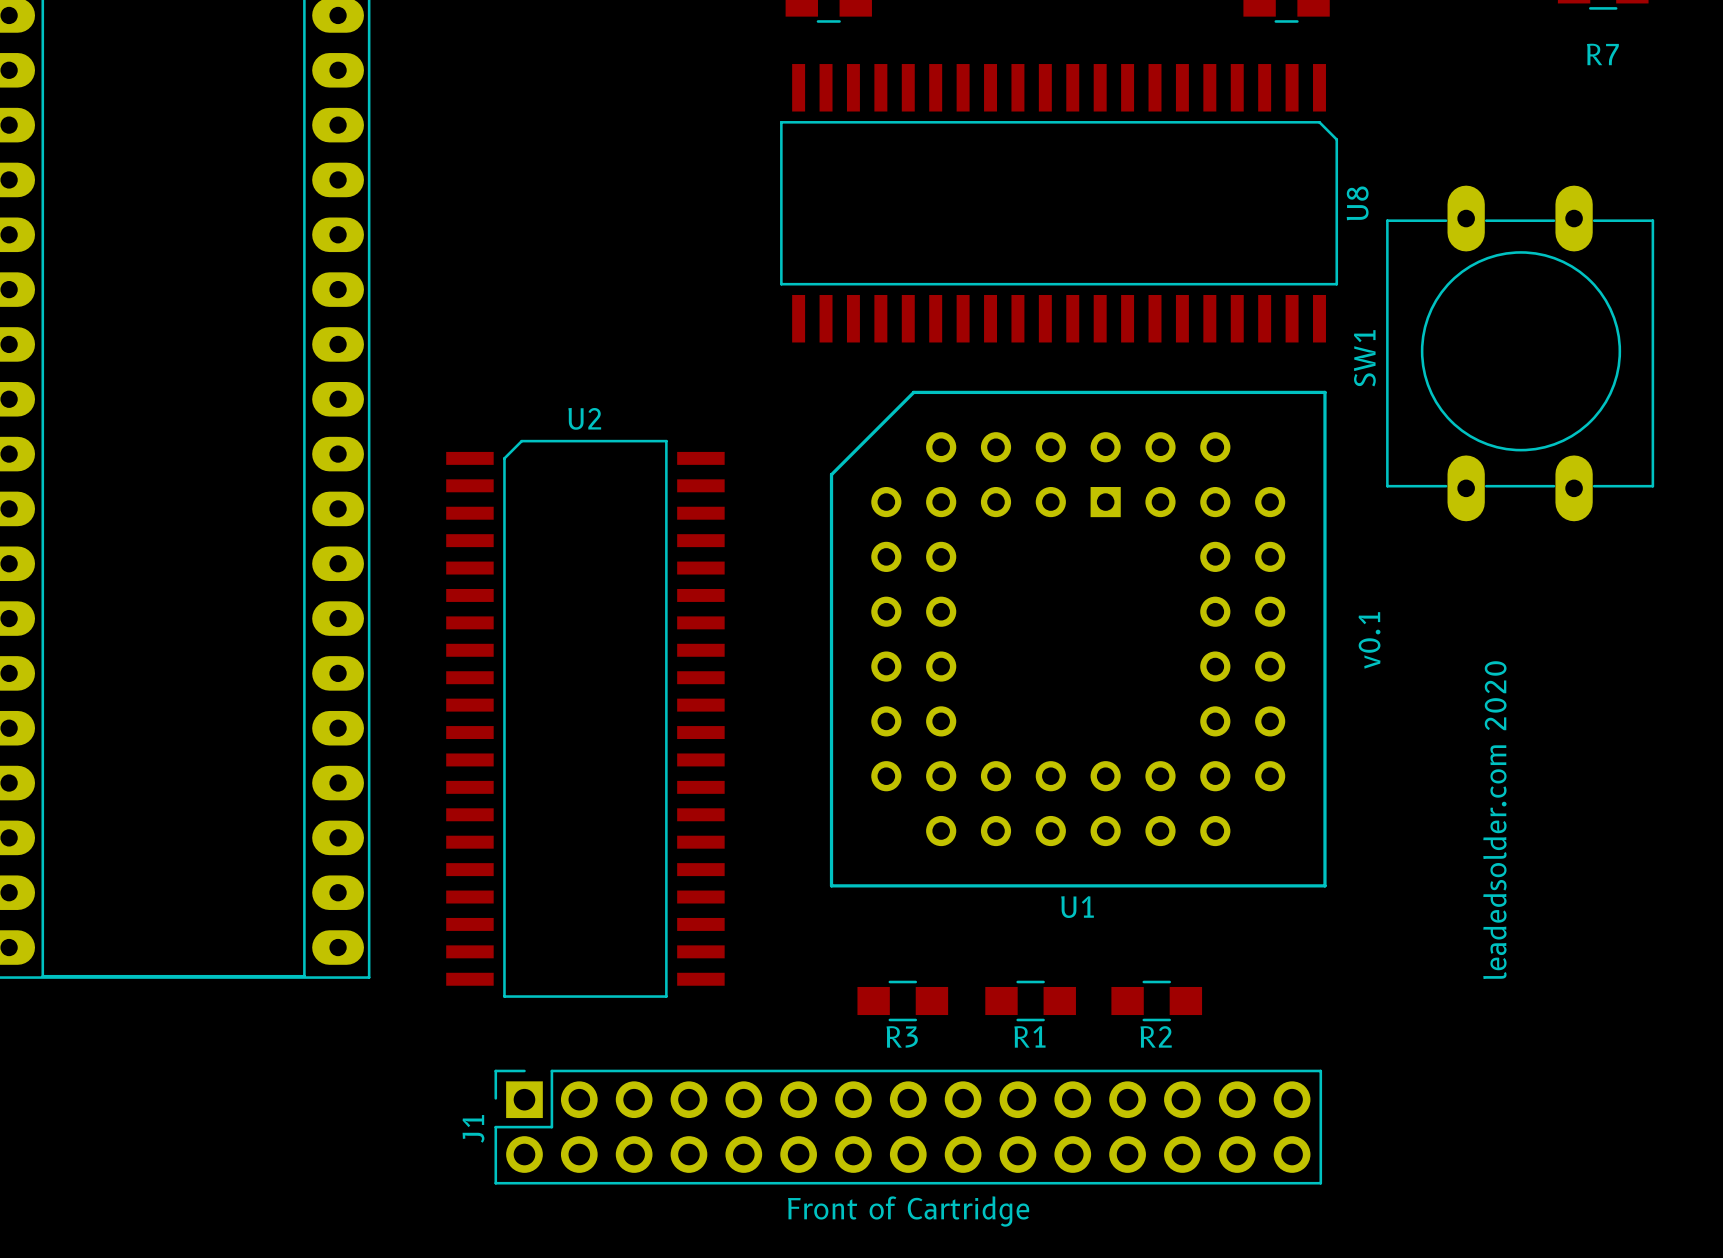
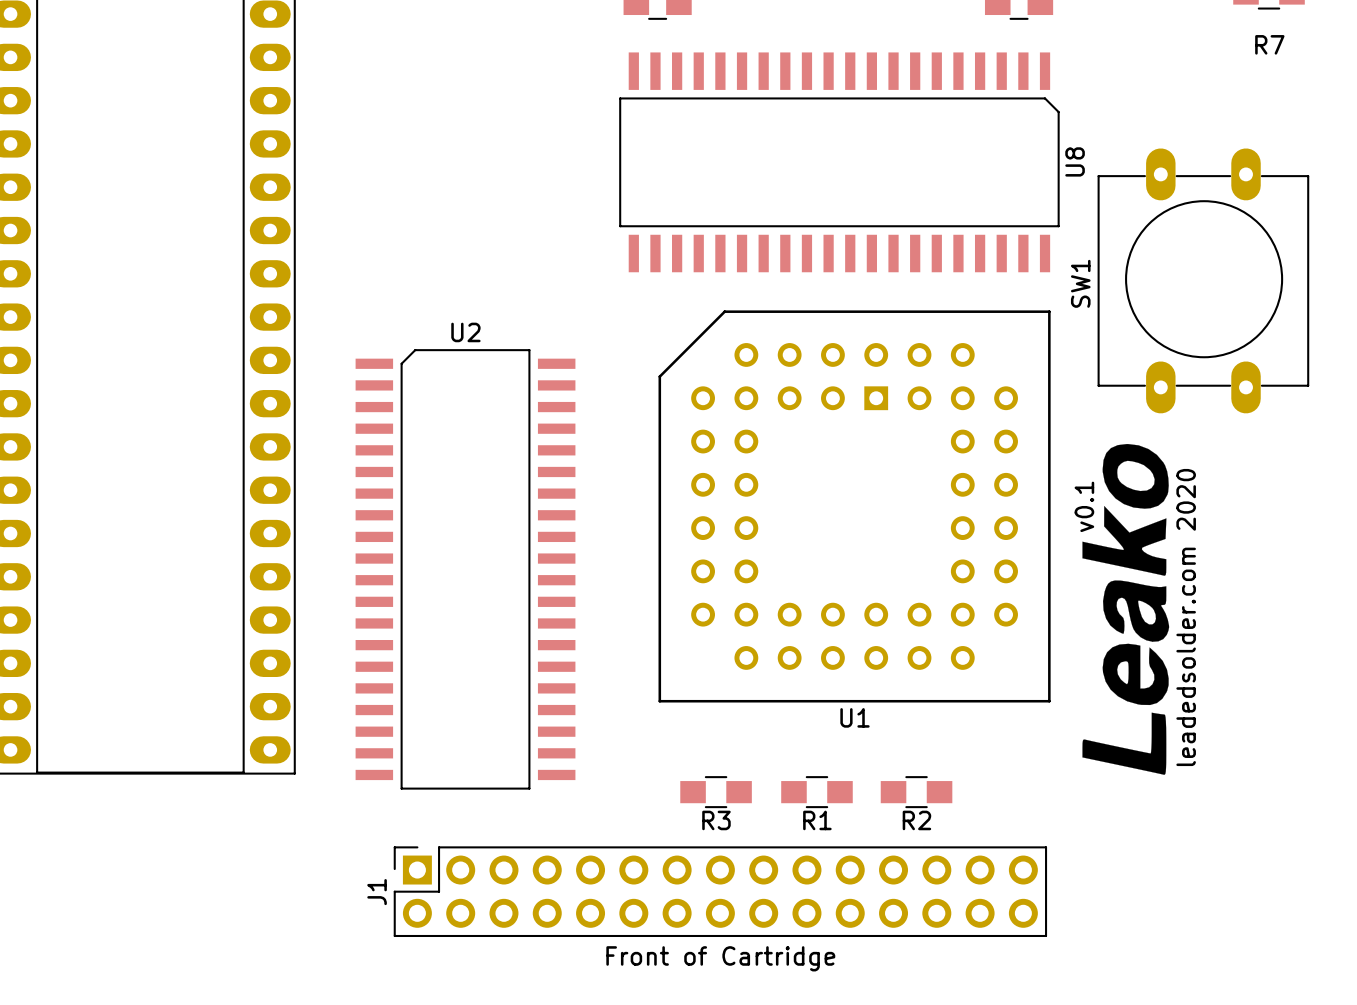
drawing: none -> [1082, 444, 1170, 775]
text position: leadedsolder.com 2020 (1494, 820) -> leadedsolder.com 2020 (1186, 617)

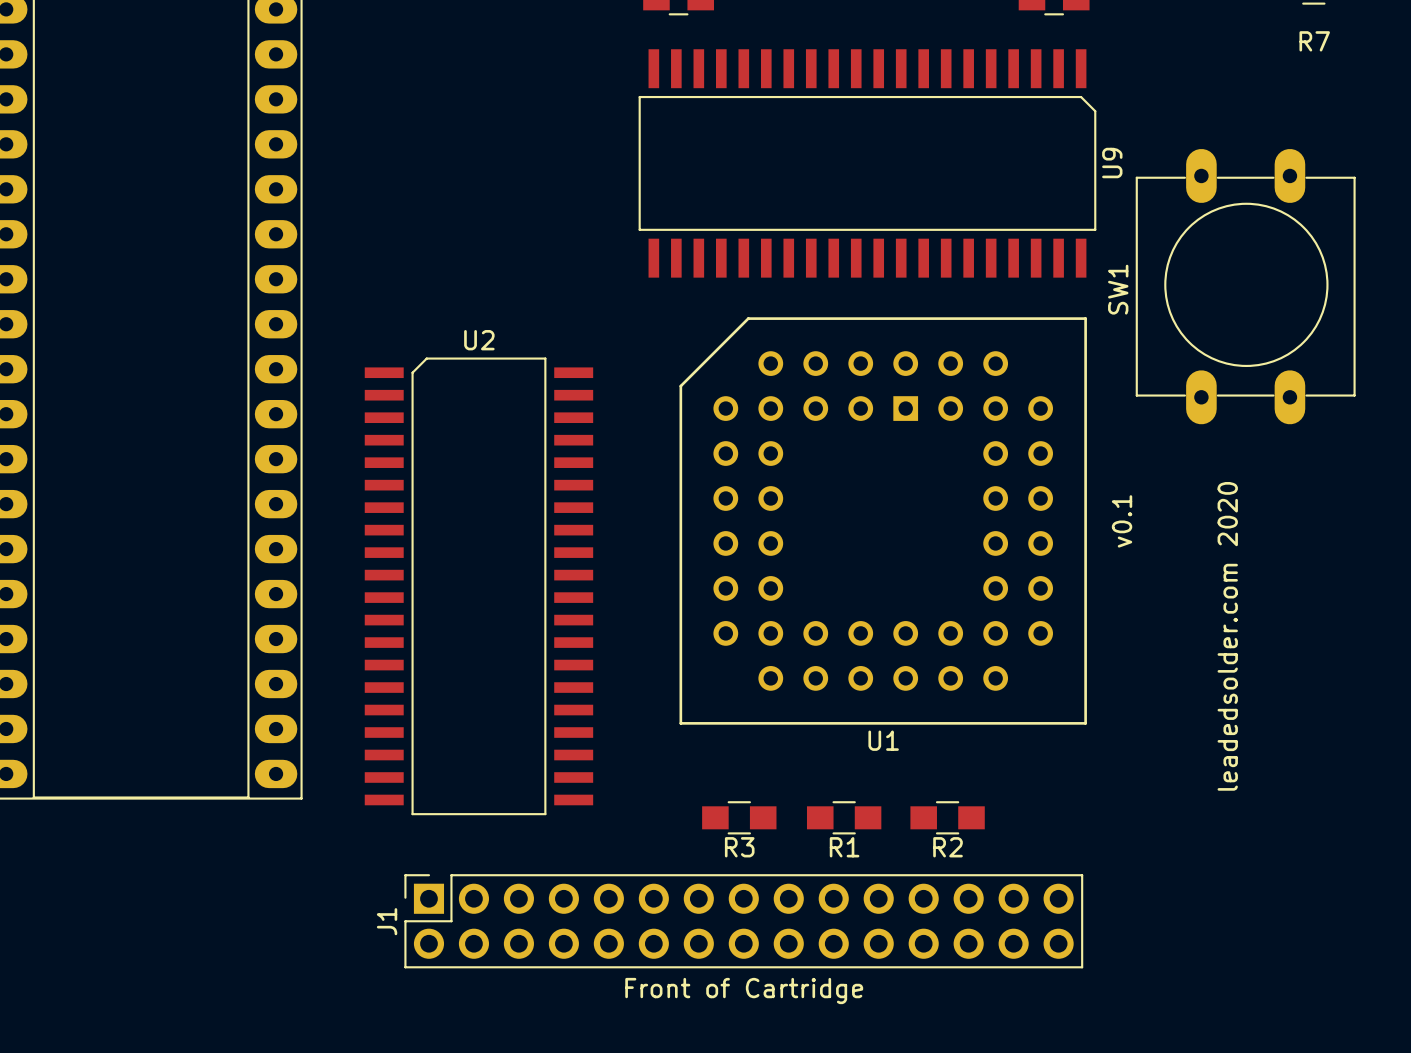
U8 name: U8 (1075, 161) -> U9 (1112, 163)
drawing: [1082, 444, 1170, 775] -> none

